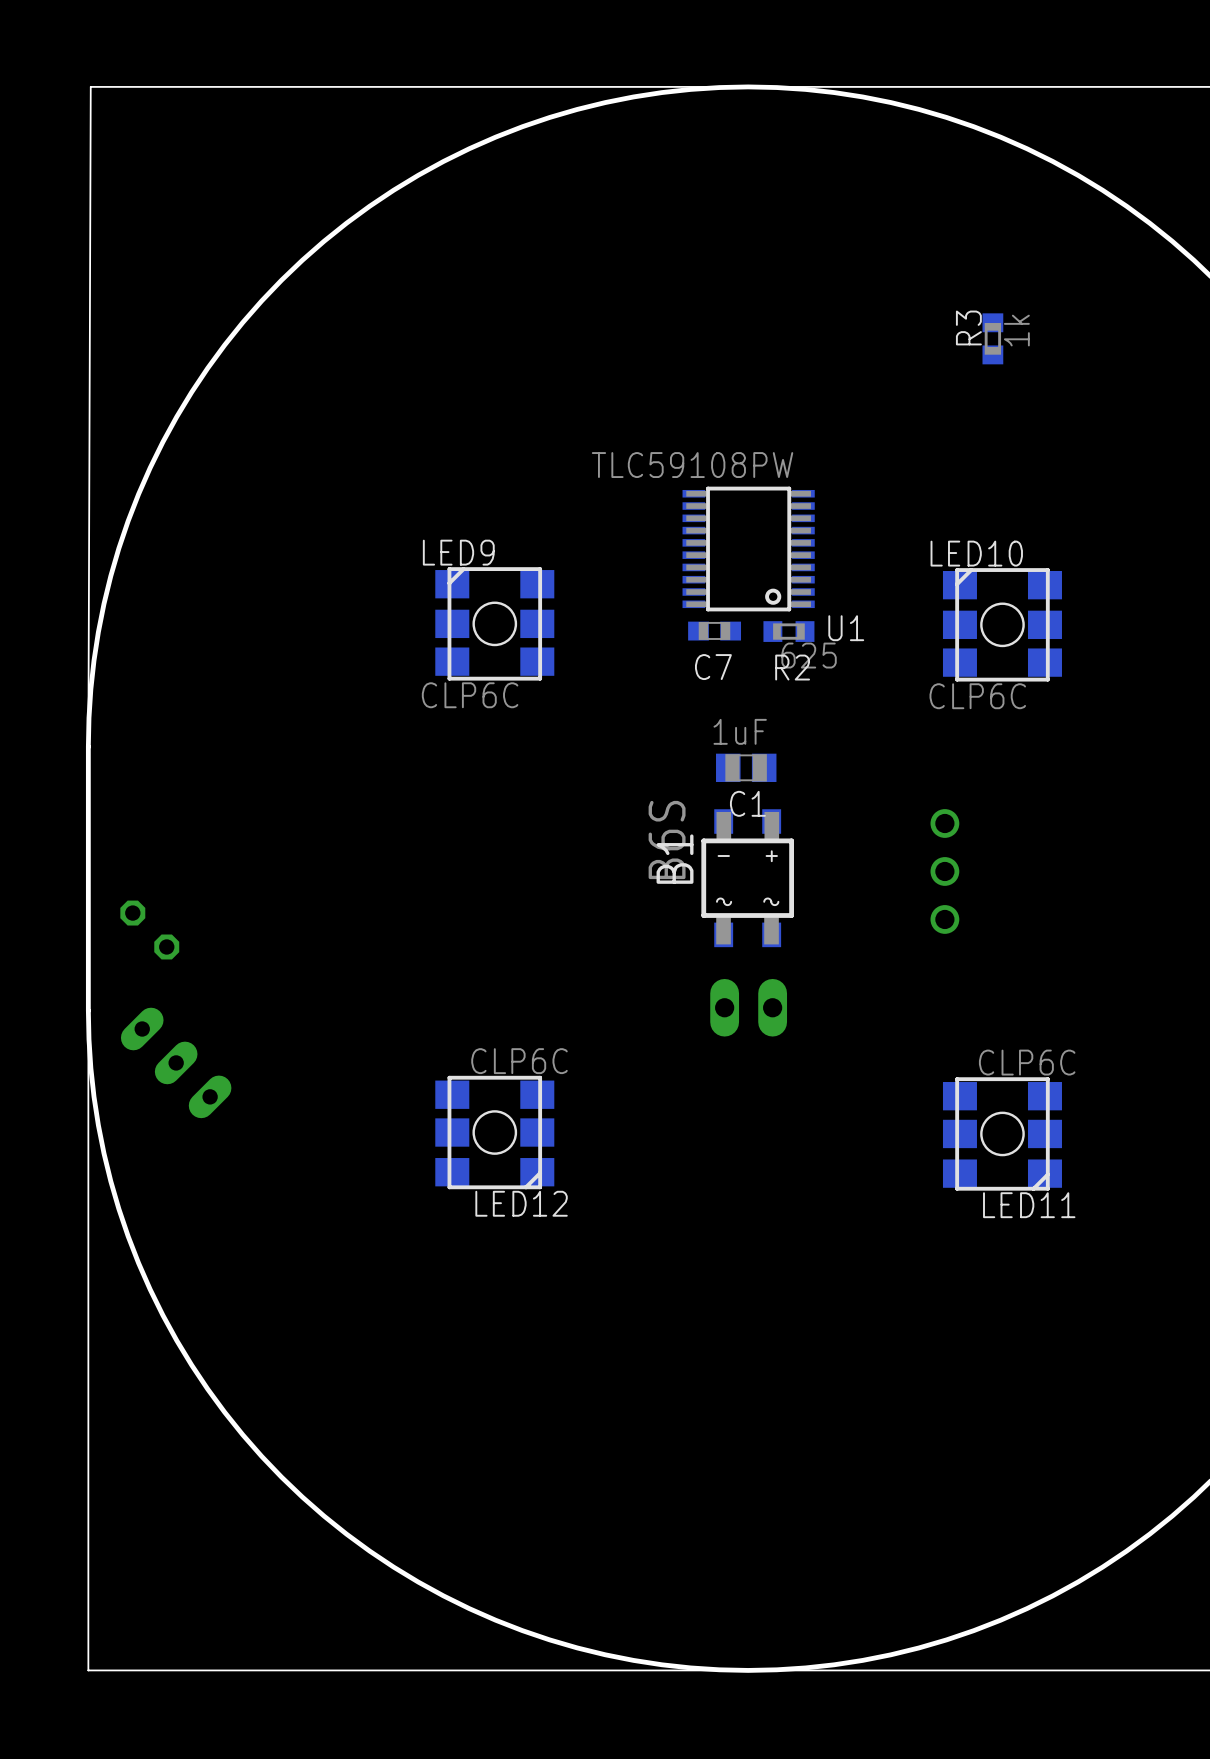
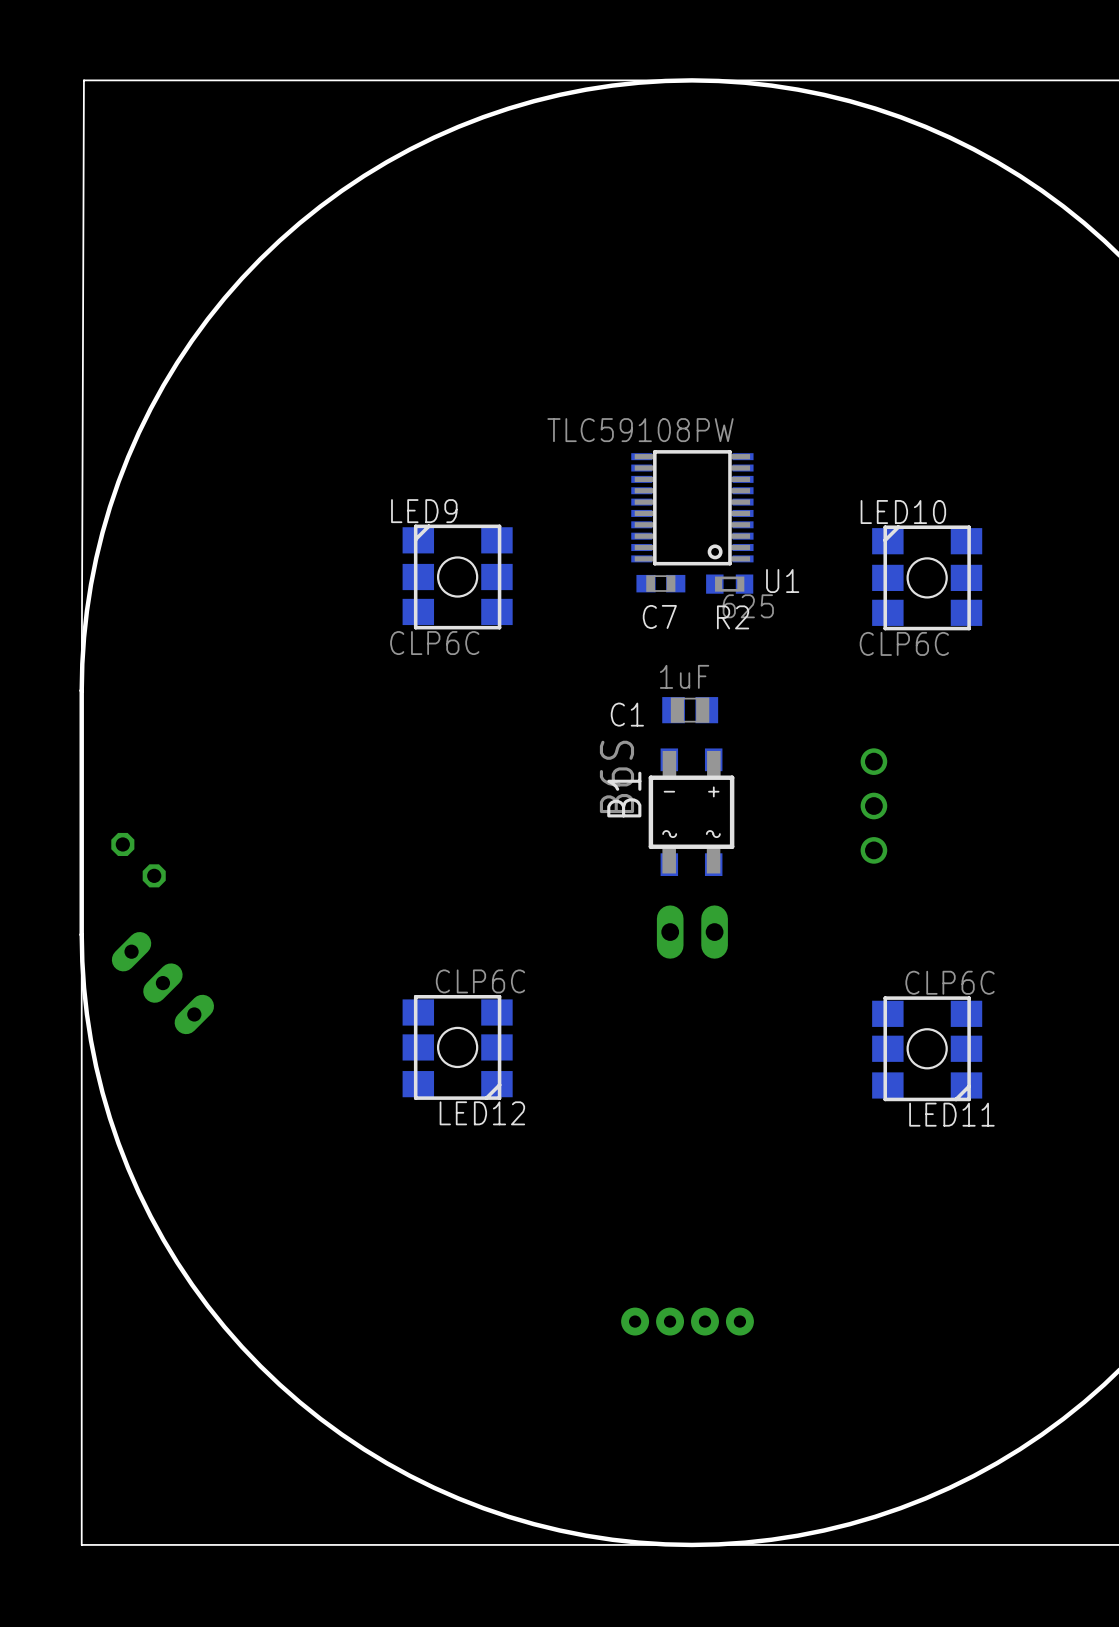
R3: 1k (992, 338) -> none
C1 name position: C1 (747, 803) -> C1 (627, 714)
part: none -> (687, 1321)

